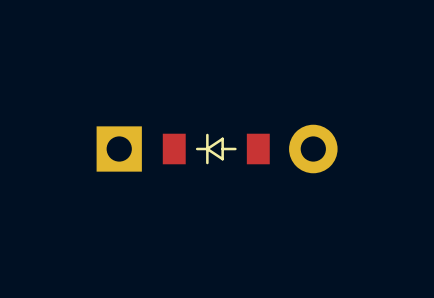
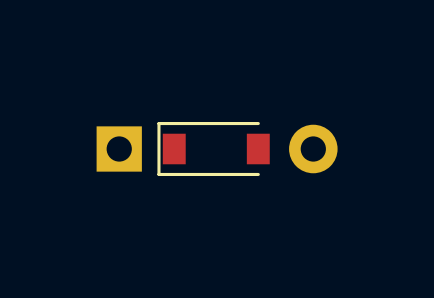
part footprint: [96, 124, 338, 174] -> [96, 122, 338, 177]

